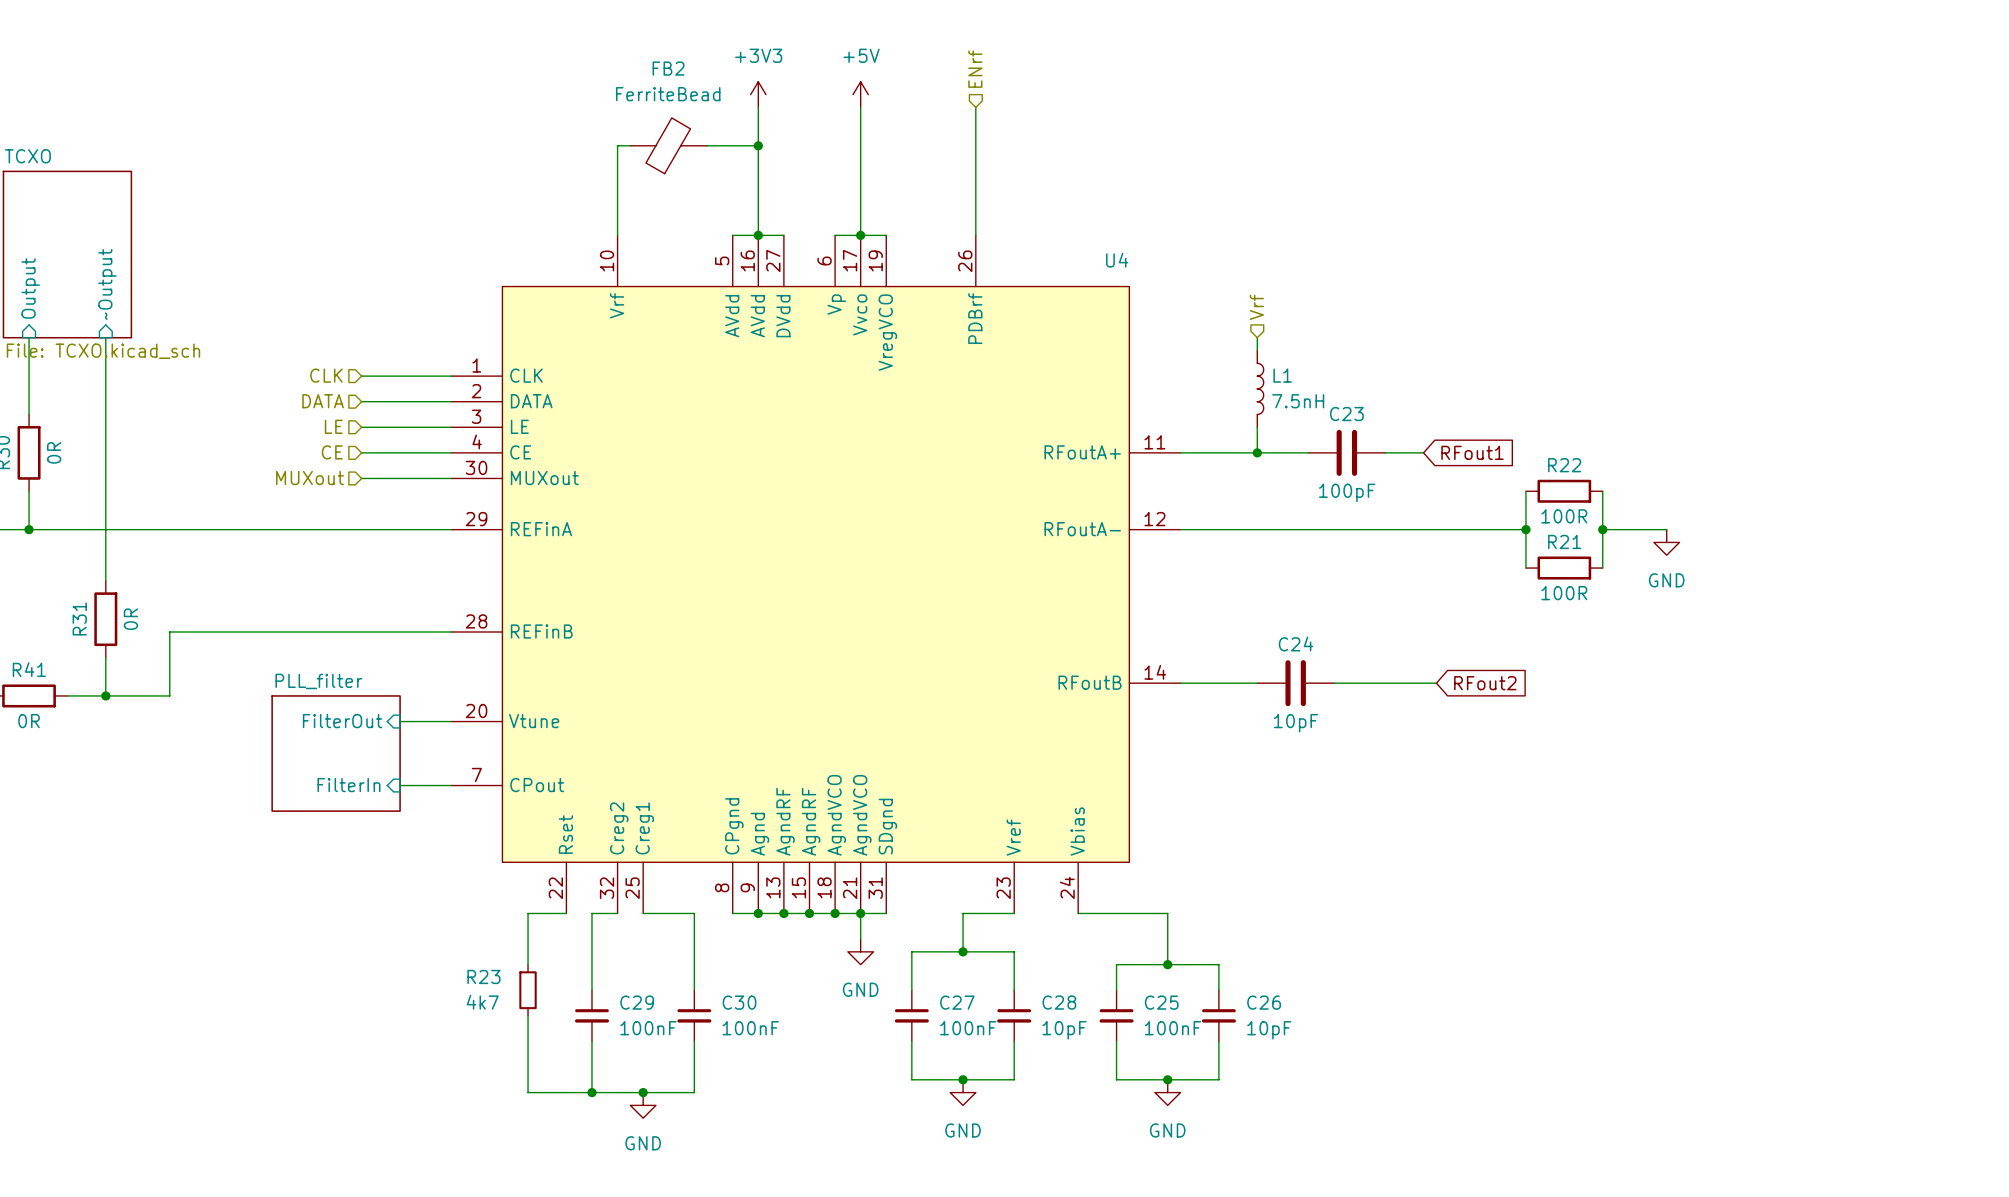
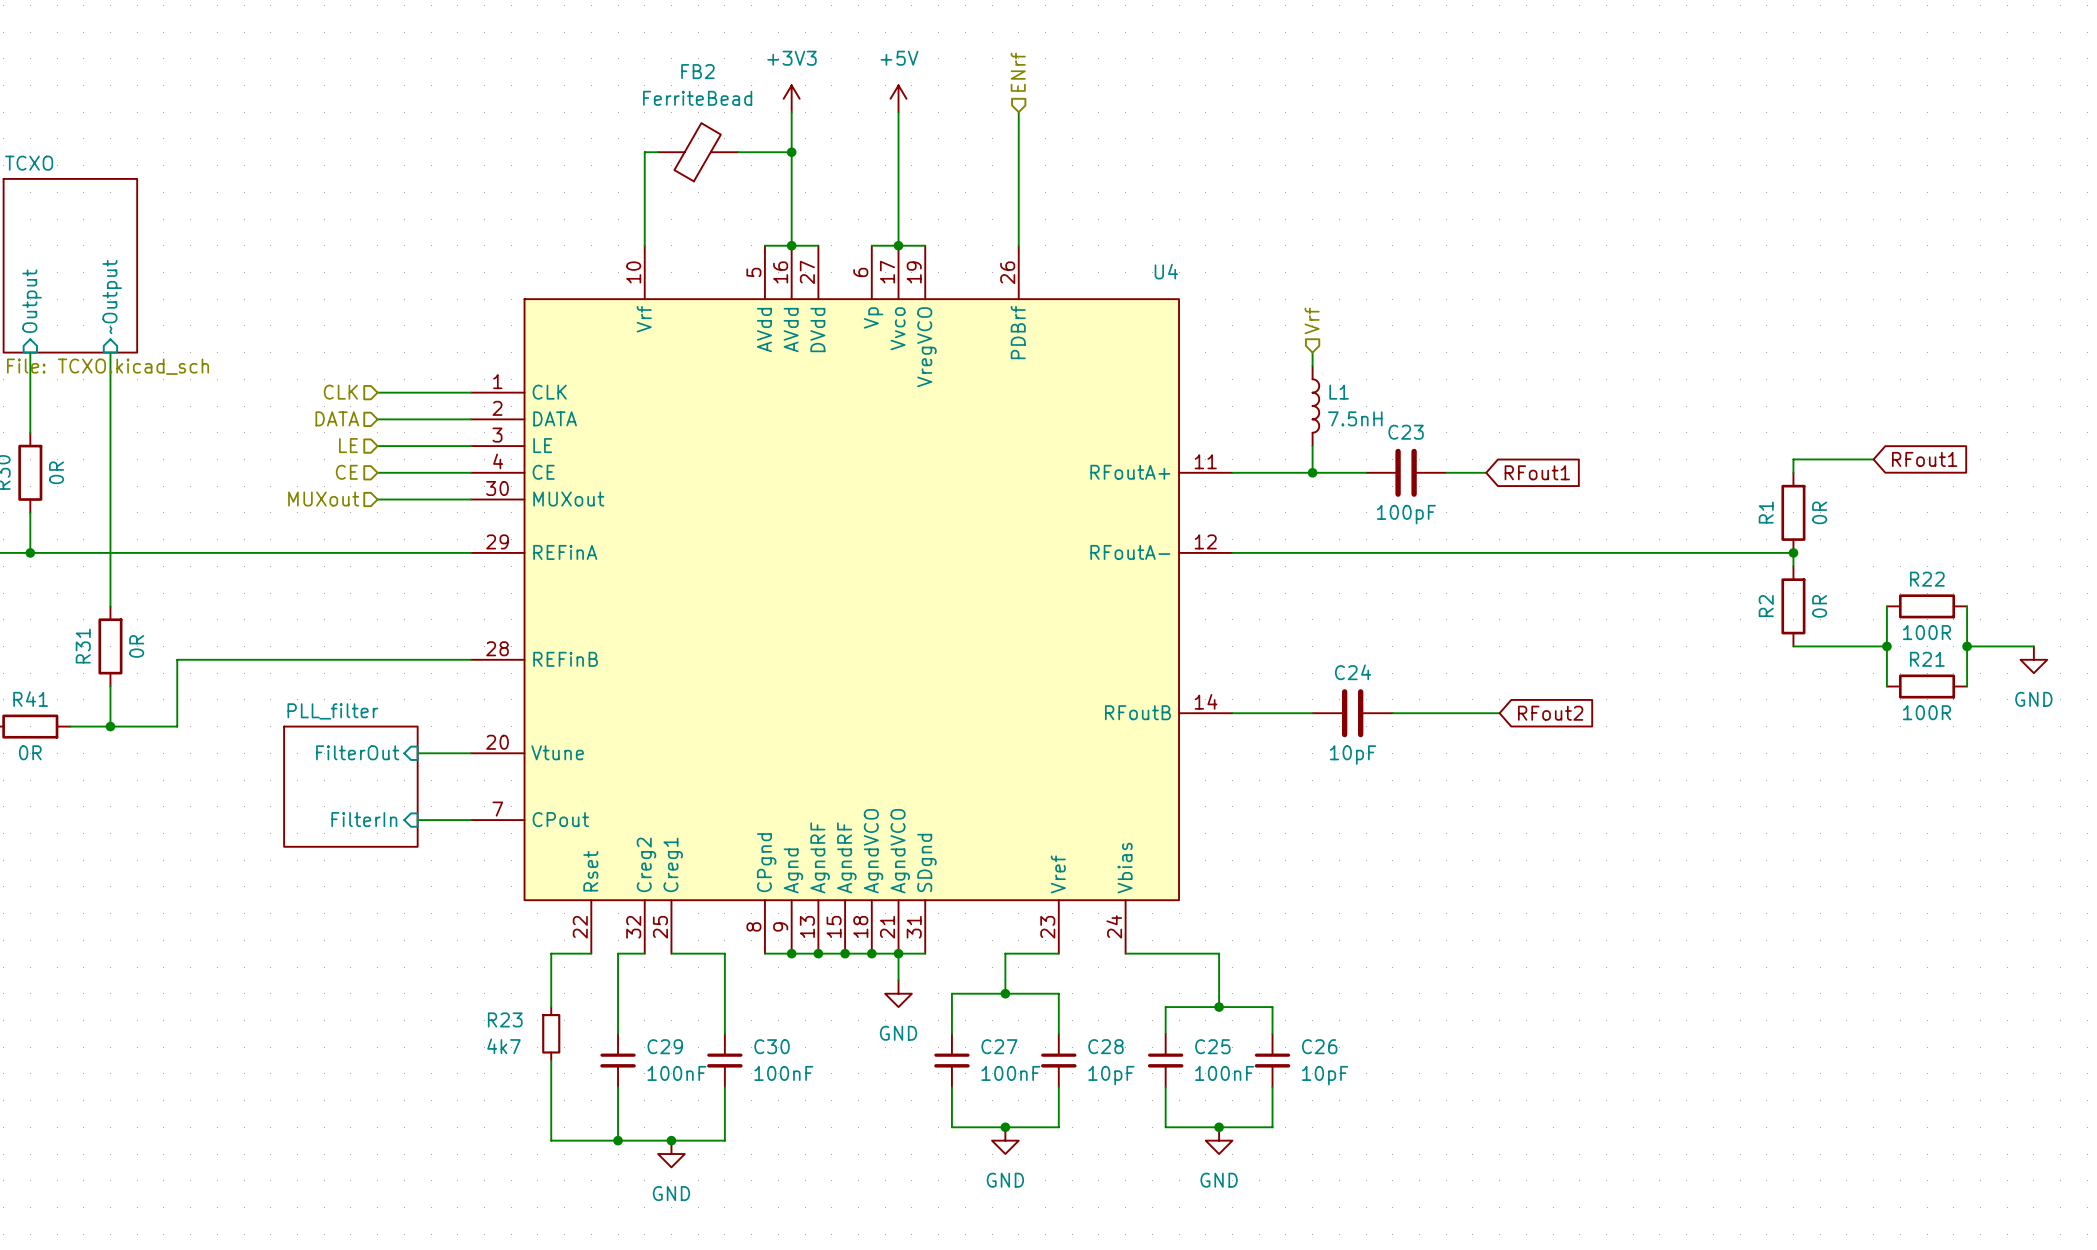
wire: none -> (1873, 459) (1793, 459) (1793, 472)
global label: none -> RFout1 (1924, 459)
wire: (1525, 491) (1525, 568) -> none
R22 position: (1564, 491) -> (1927, 606)
wire: (1602, 491) (1602, 568) -> (1886, 606) (1886, 686)
R1: none -> 0R (1793, 512)
wire: none -> (1593, 552) (1673, 552)
junction: (1525, 529) -> none
junction: (1602, 529) -> none
wire: none -> (1740, 552) (1793, 552) (1793, 566)
junction: none -> (1793, 552)
power symbol: GND (1666, 542) -> none
R21 position: (1564, 568) -> (1927, 686)
R2: none -> 0R (1793, 606)
wire: none -> (1967, 606) (1967, 686)
wire: none -> (1793, 646) (1886, 646)
junction: none -> (1886, 646)
wire: none -> (1967, 646) (2033, 646)
junction: none -> (1967, 646)
power symbol: none -> GND (2033, 659)

